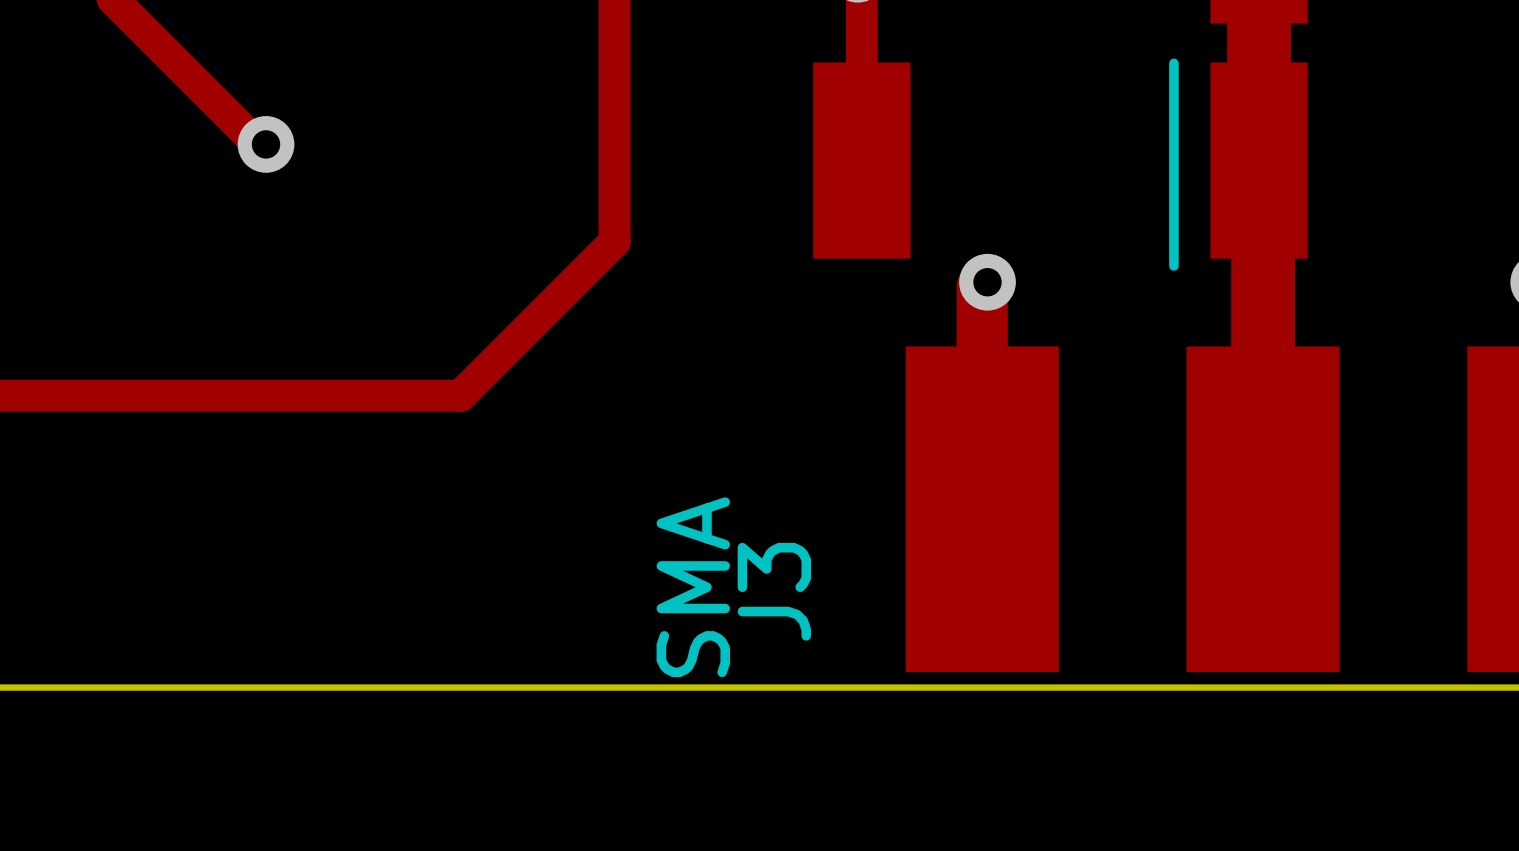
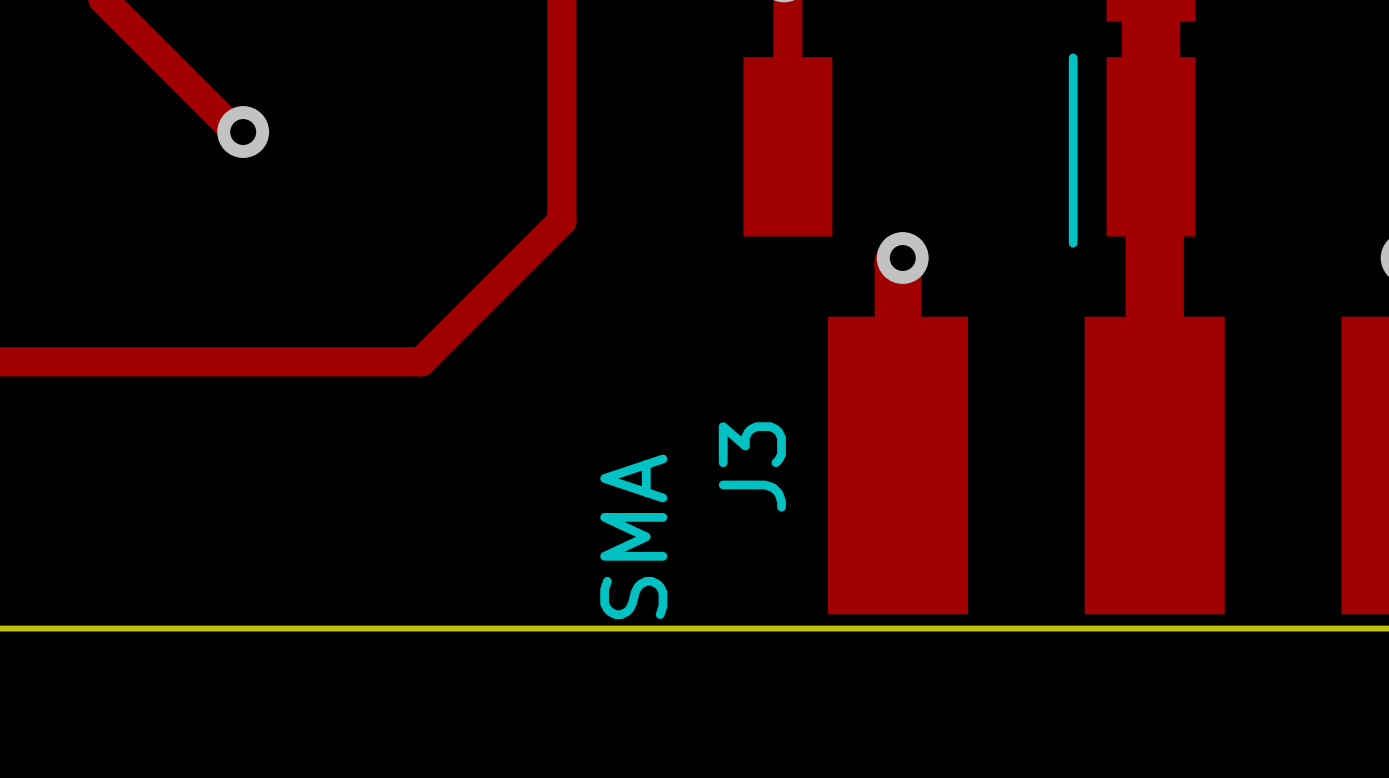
J3 name position: J3 (774, 591) -> J3 (752, 466)

